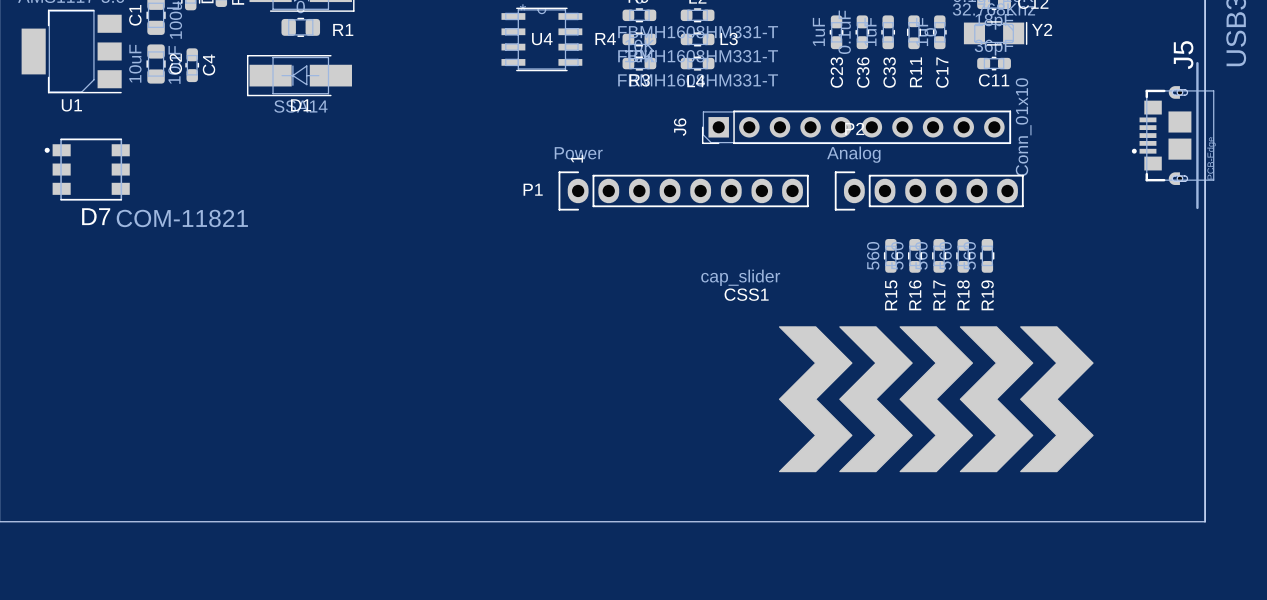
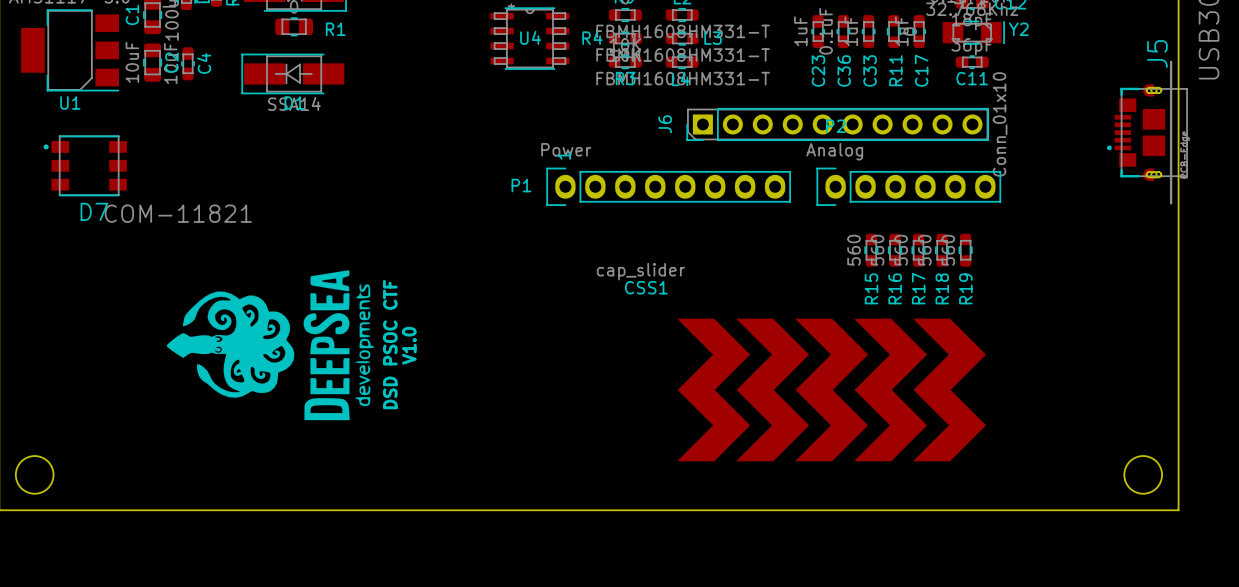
drawing: none -> [166, 270, 375, 421]
text: none -> DSD PSOC CTF (390, 344)
text: none -> V1.0 (409, 345)
CSS1 position: (936, 399) -> (831, 389)
round board edge: none -> [14, 455, 55, 495]
round board edge: none -> [1123, 455, 1163, 495]

